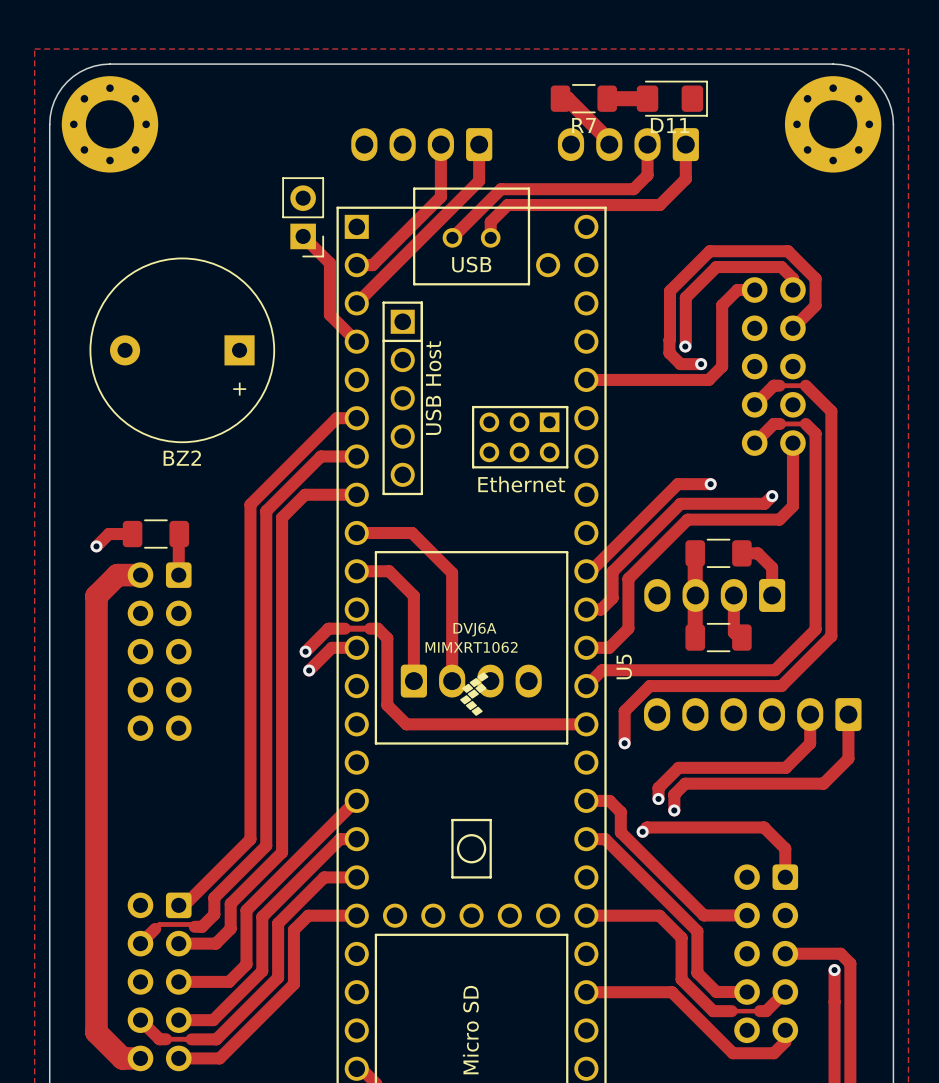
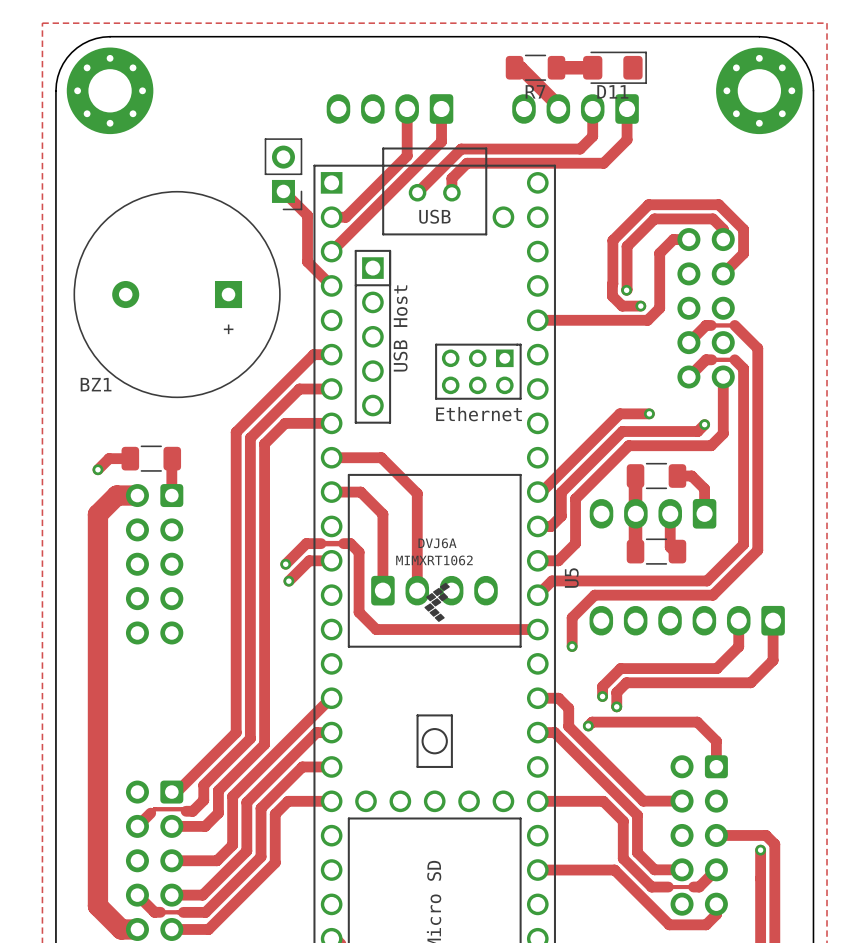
BZ2: (182, 350) -> none
BZ1: none -> (177, 294)

